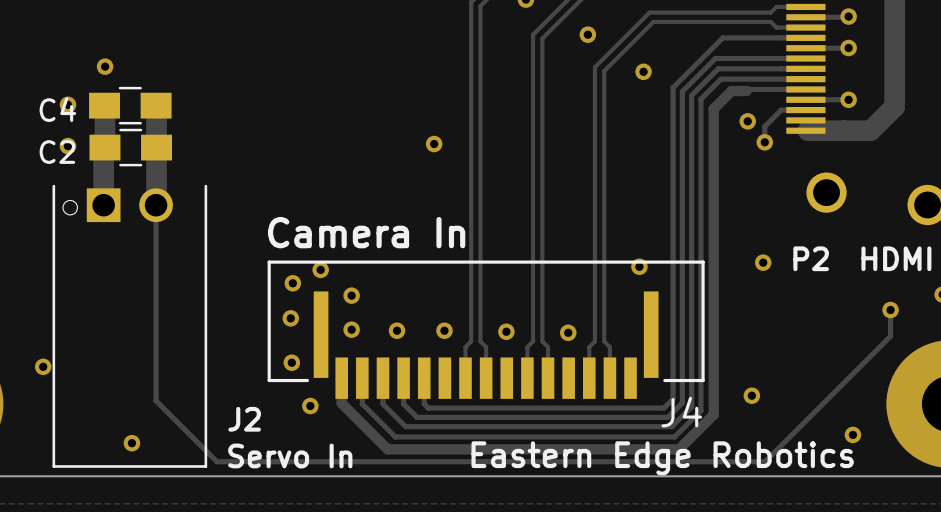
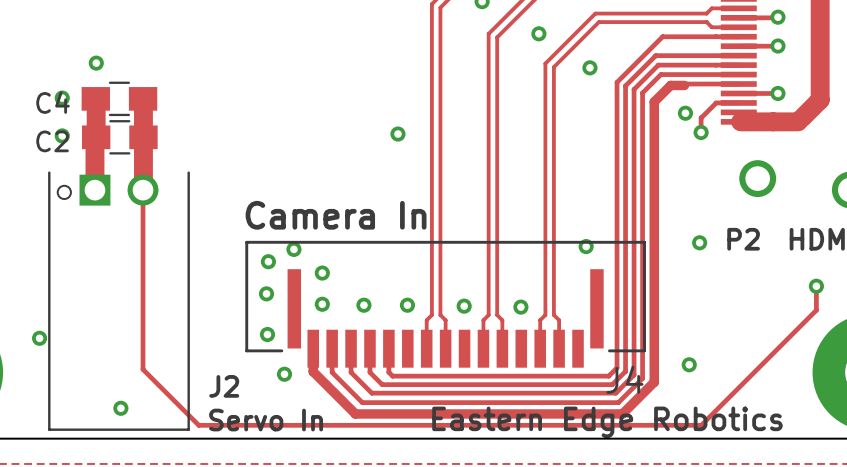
via: (852, 434) -> none

